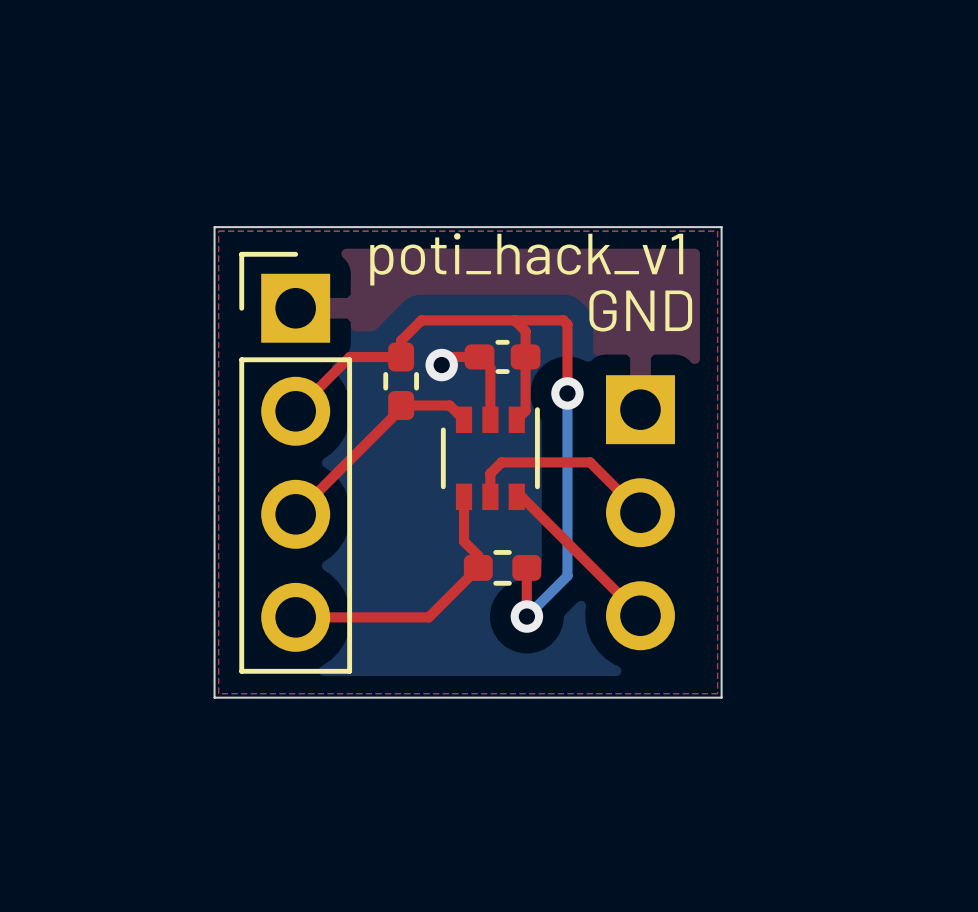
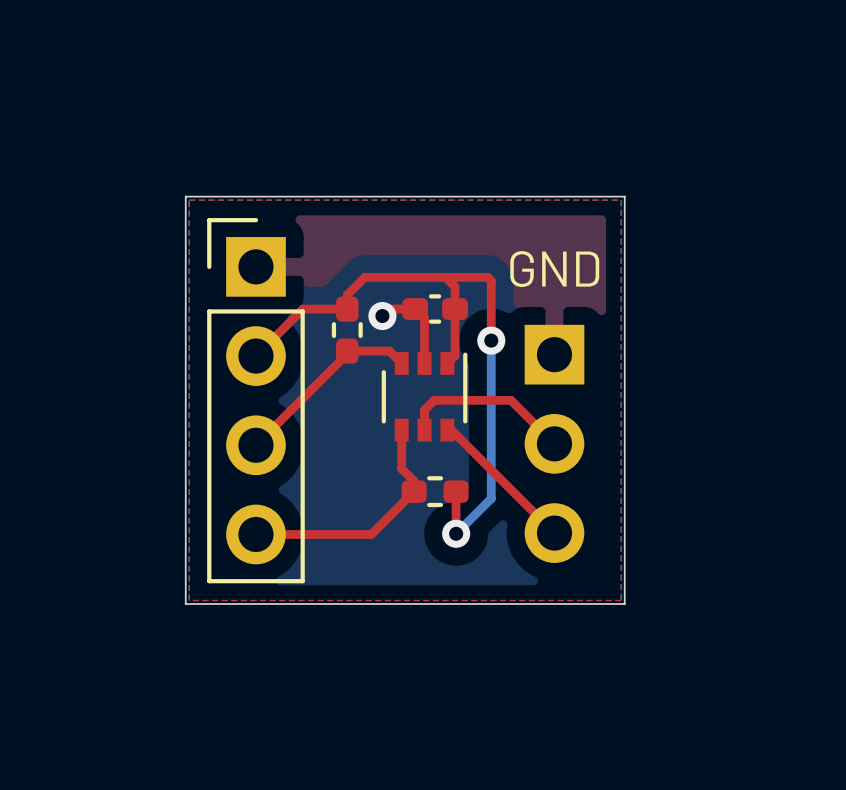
text: poti_hack_v1 (526, 259) -> none

